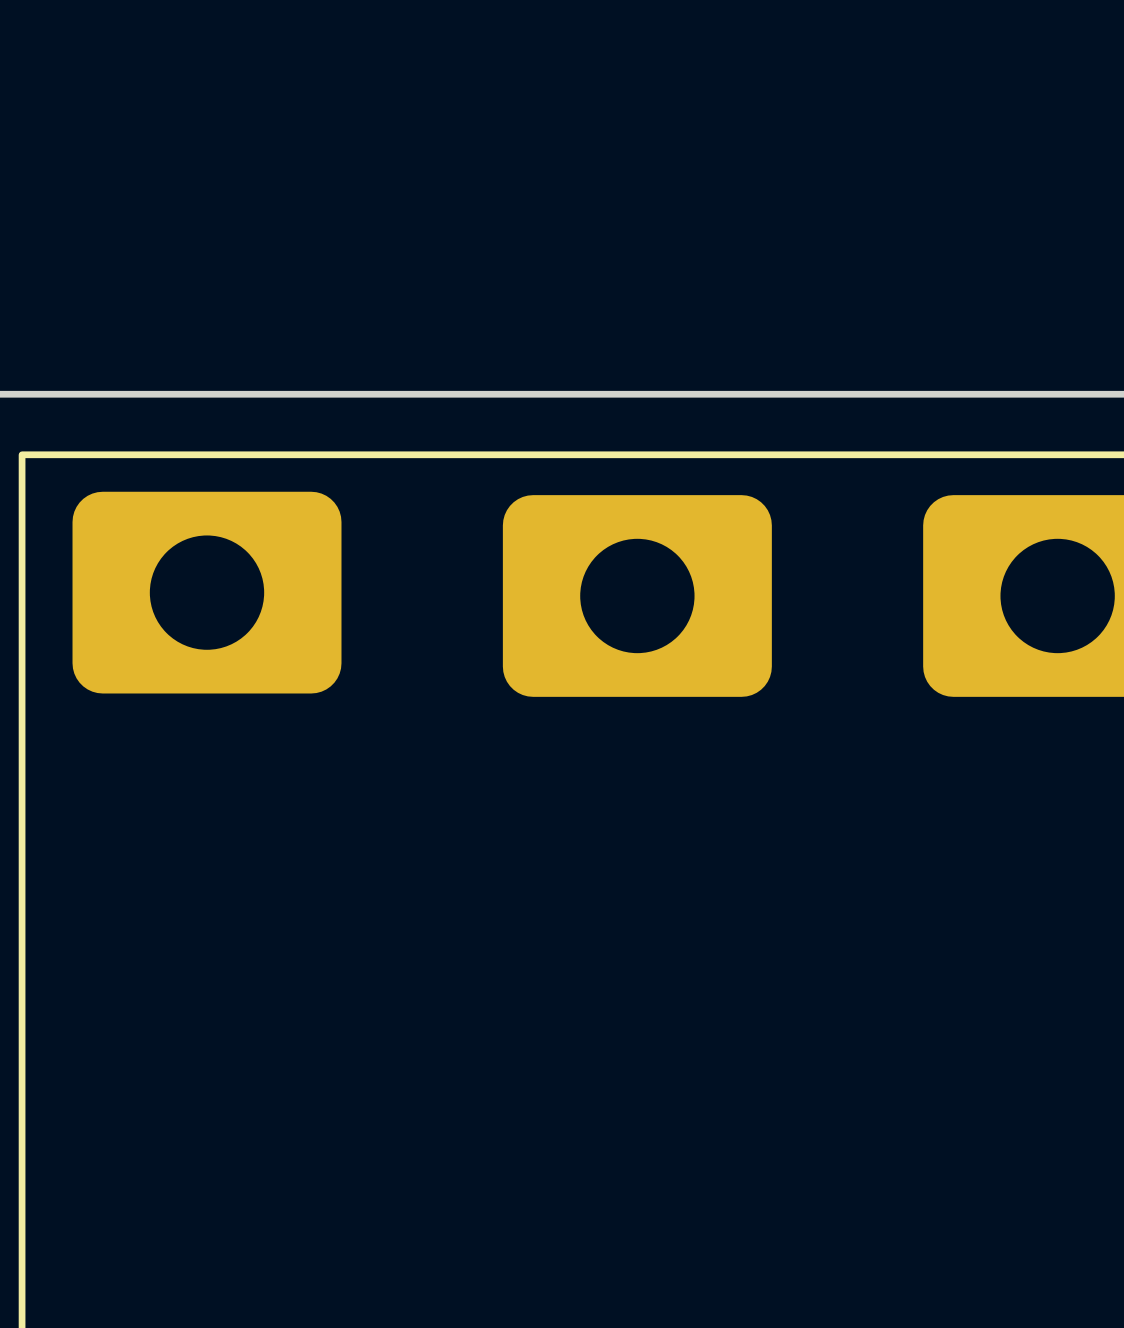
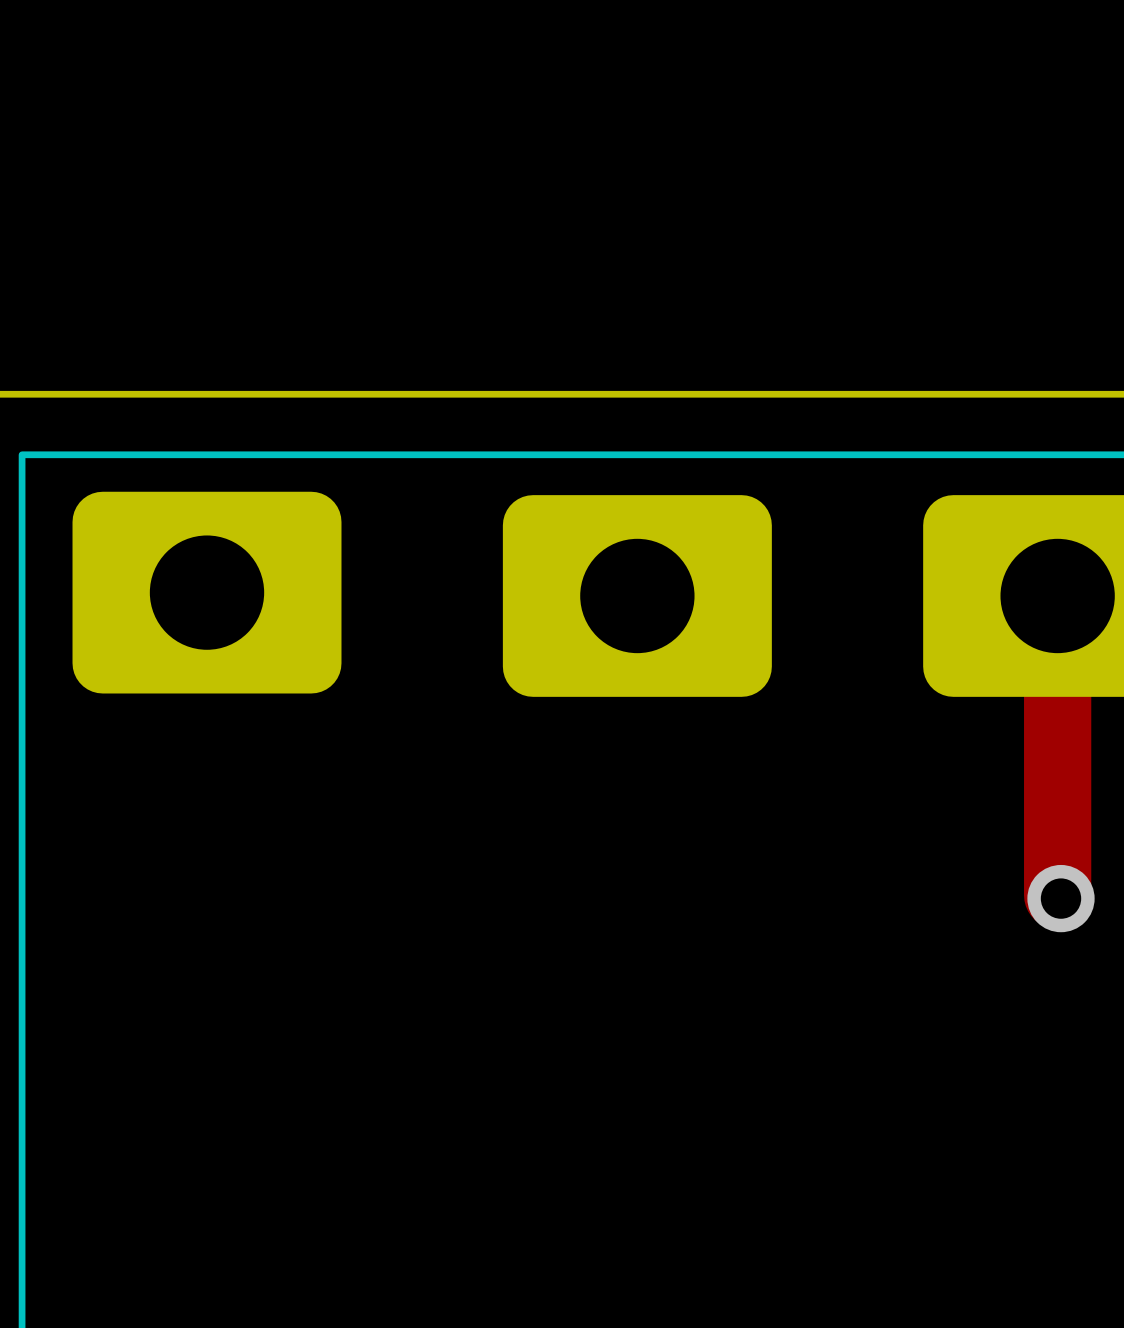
track: none -> (1057, 595) (1057, 895) (1061, 898)
via: none -> (1061, 898)

